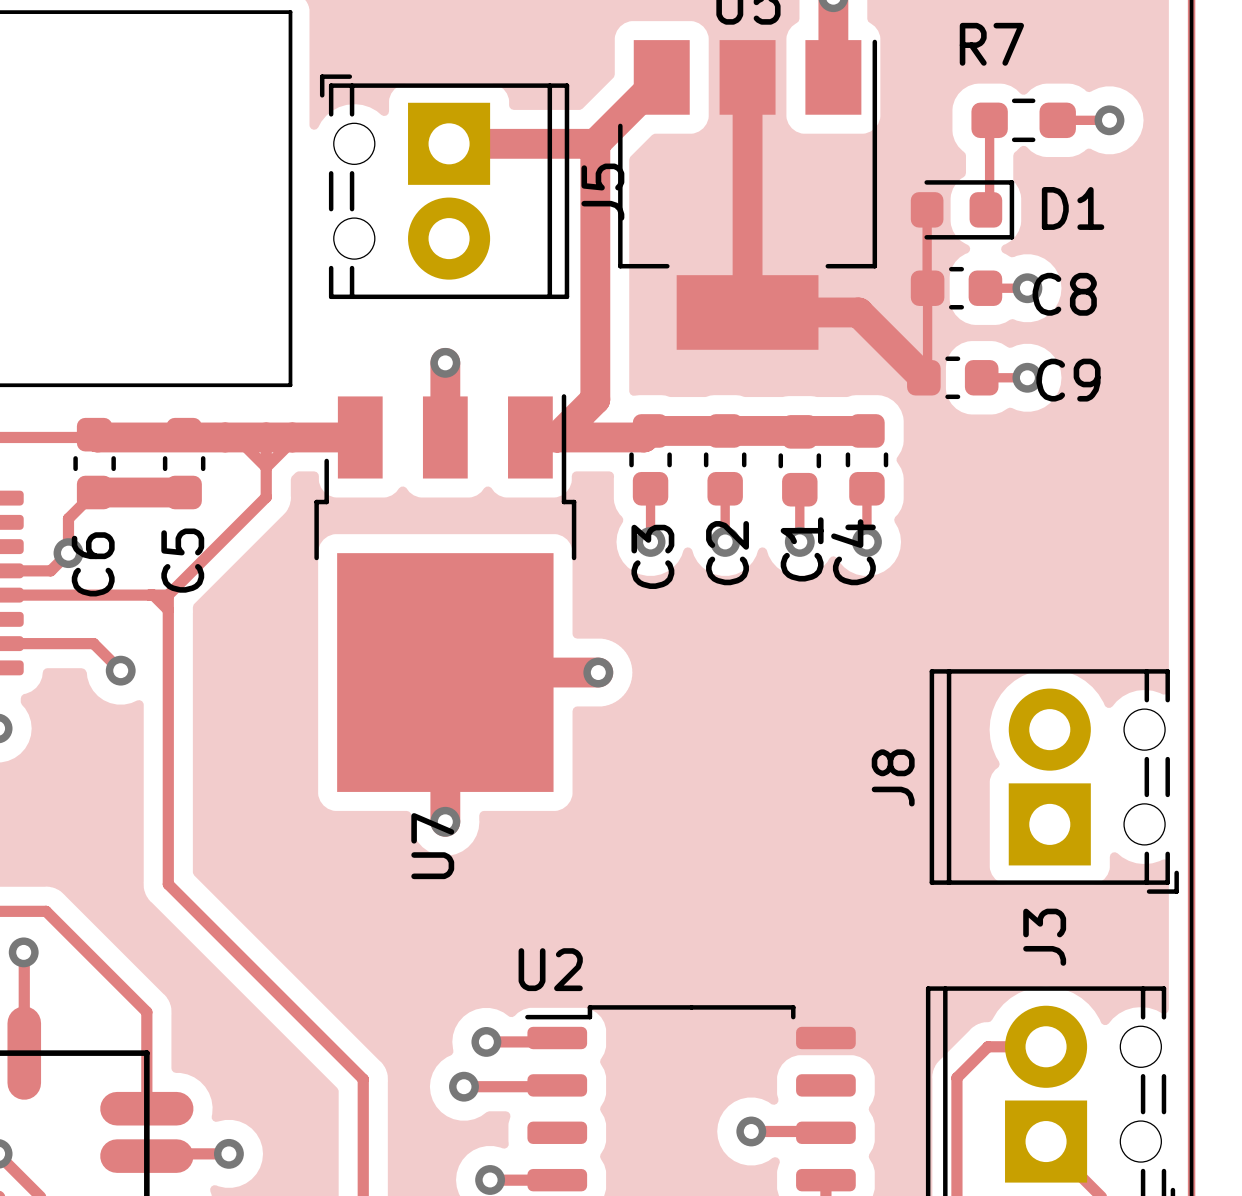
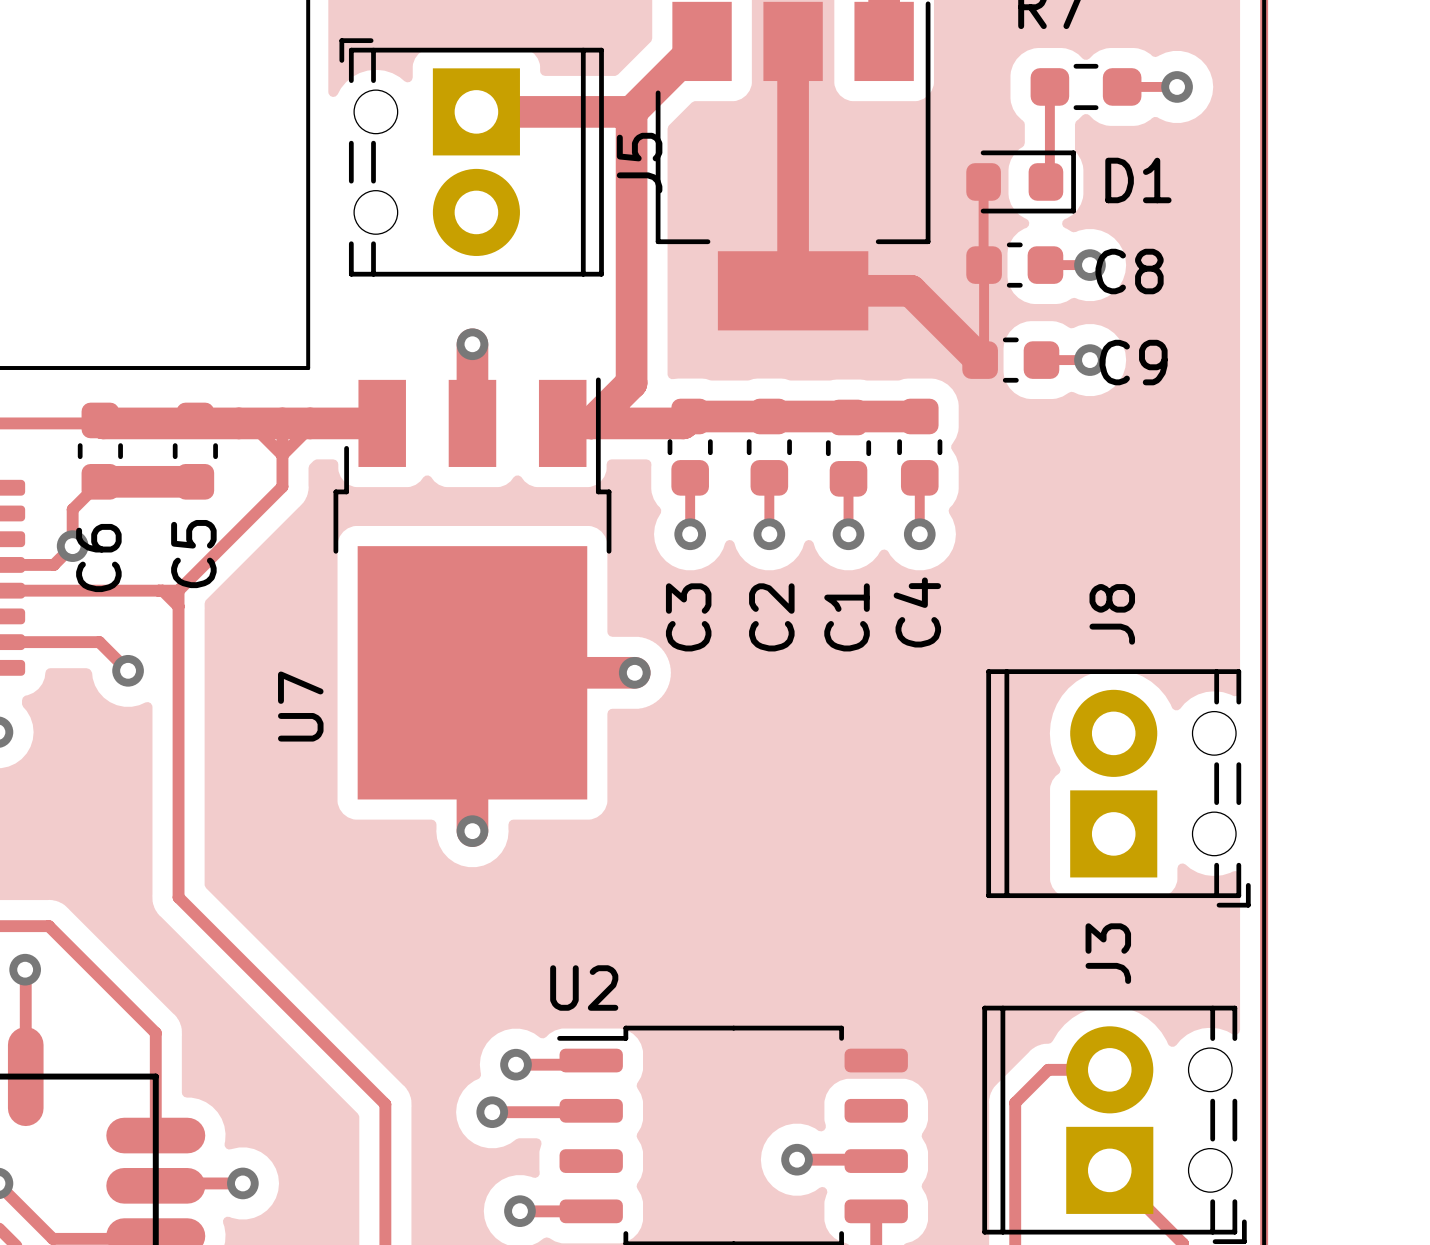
C1 name position: C1 (802, 549) -> C1 (847, 617)
C4 name position: C4 (853, 552) -> C4 (917, 612)
C2 name position: C2 (727, 553) -> C2 (771, 617)
C3 name position: C3 (652, 556) -> C3 (688, 617)
J8 name position: J8 (893, 777) -> J8 (1112, 614)
U7 name position: U7 (432, 846) -> U7 (300, 706)

